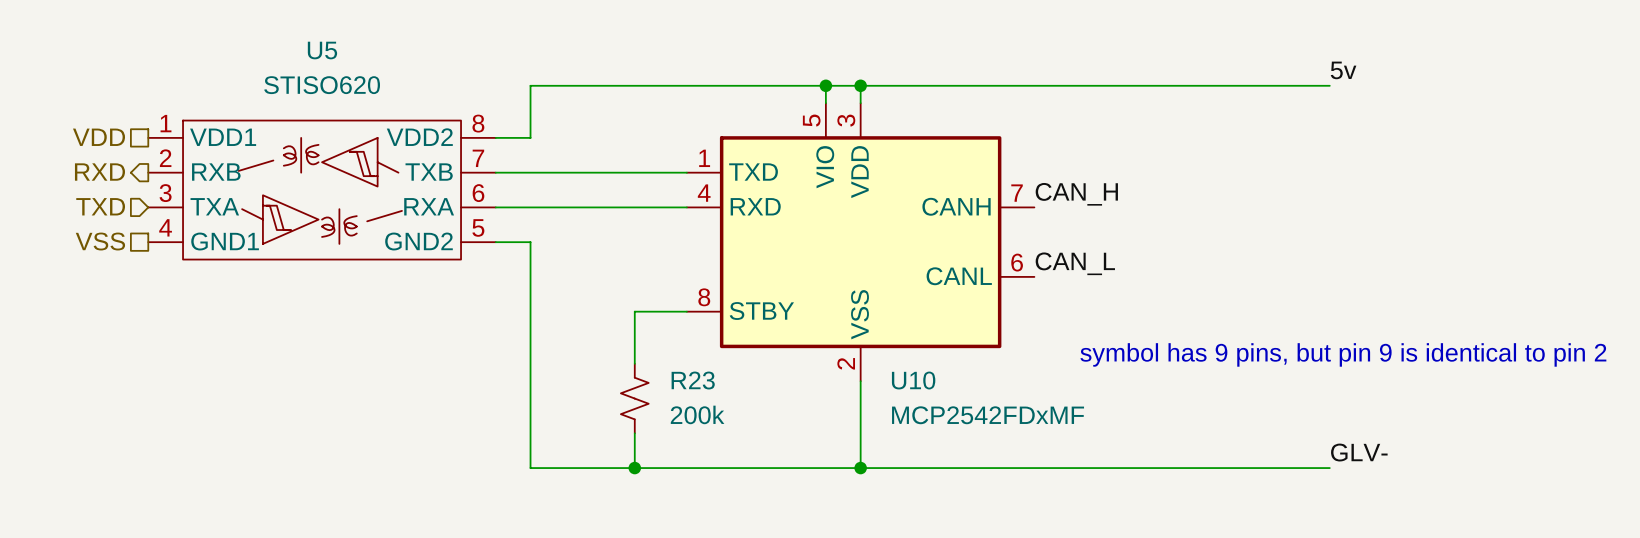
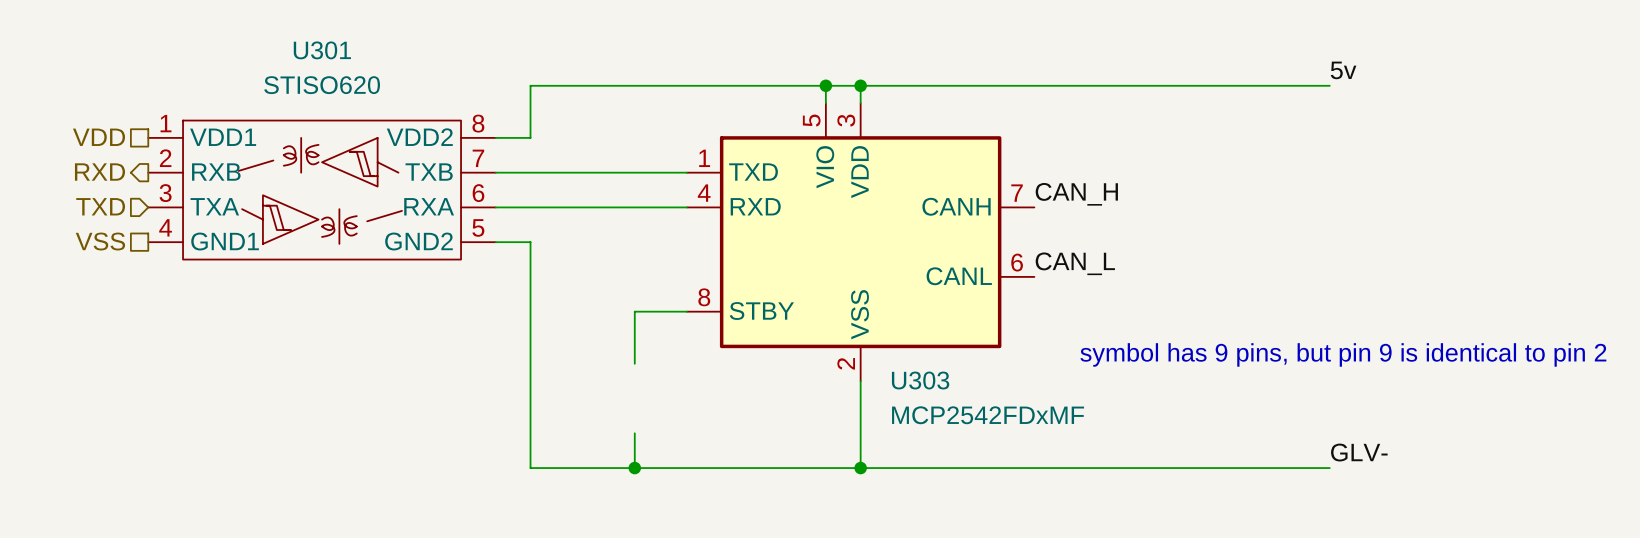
U5 name: U5 (322, 50) -> U301 (322, 50)
U10 name: U10 (913, 380) -> U303 (920, 380)
R23: 200k (634, 398) -> none

